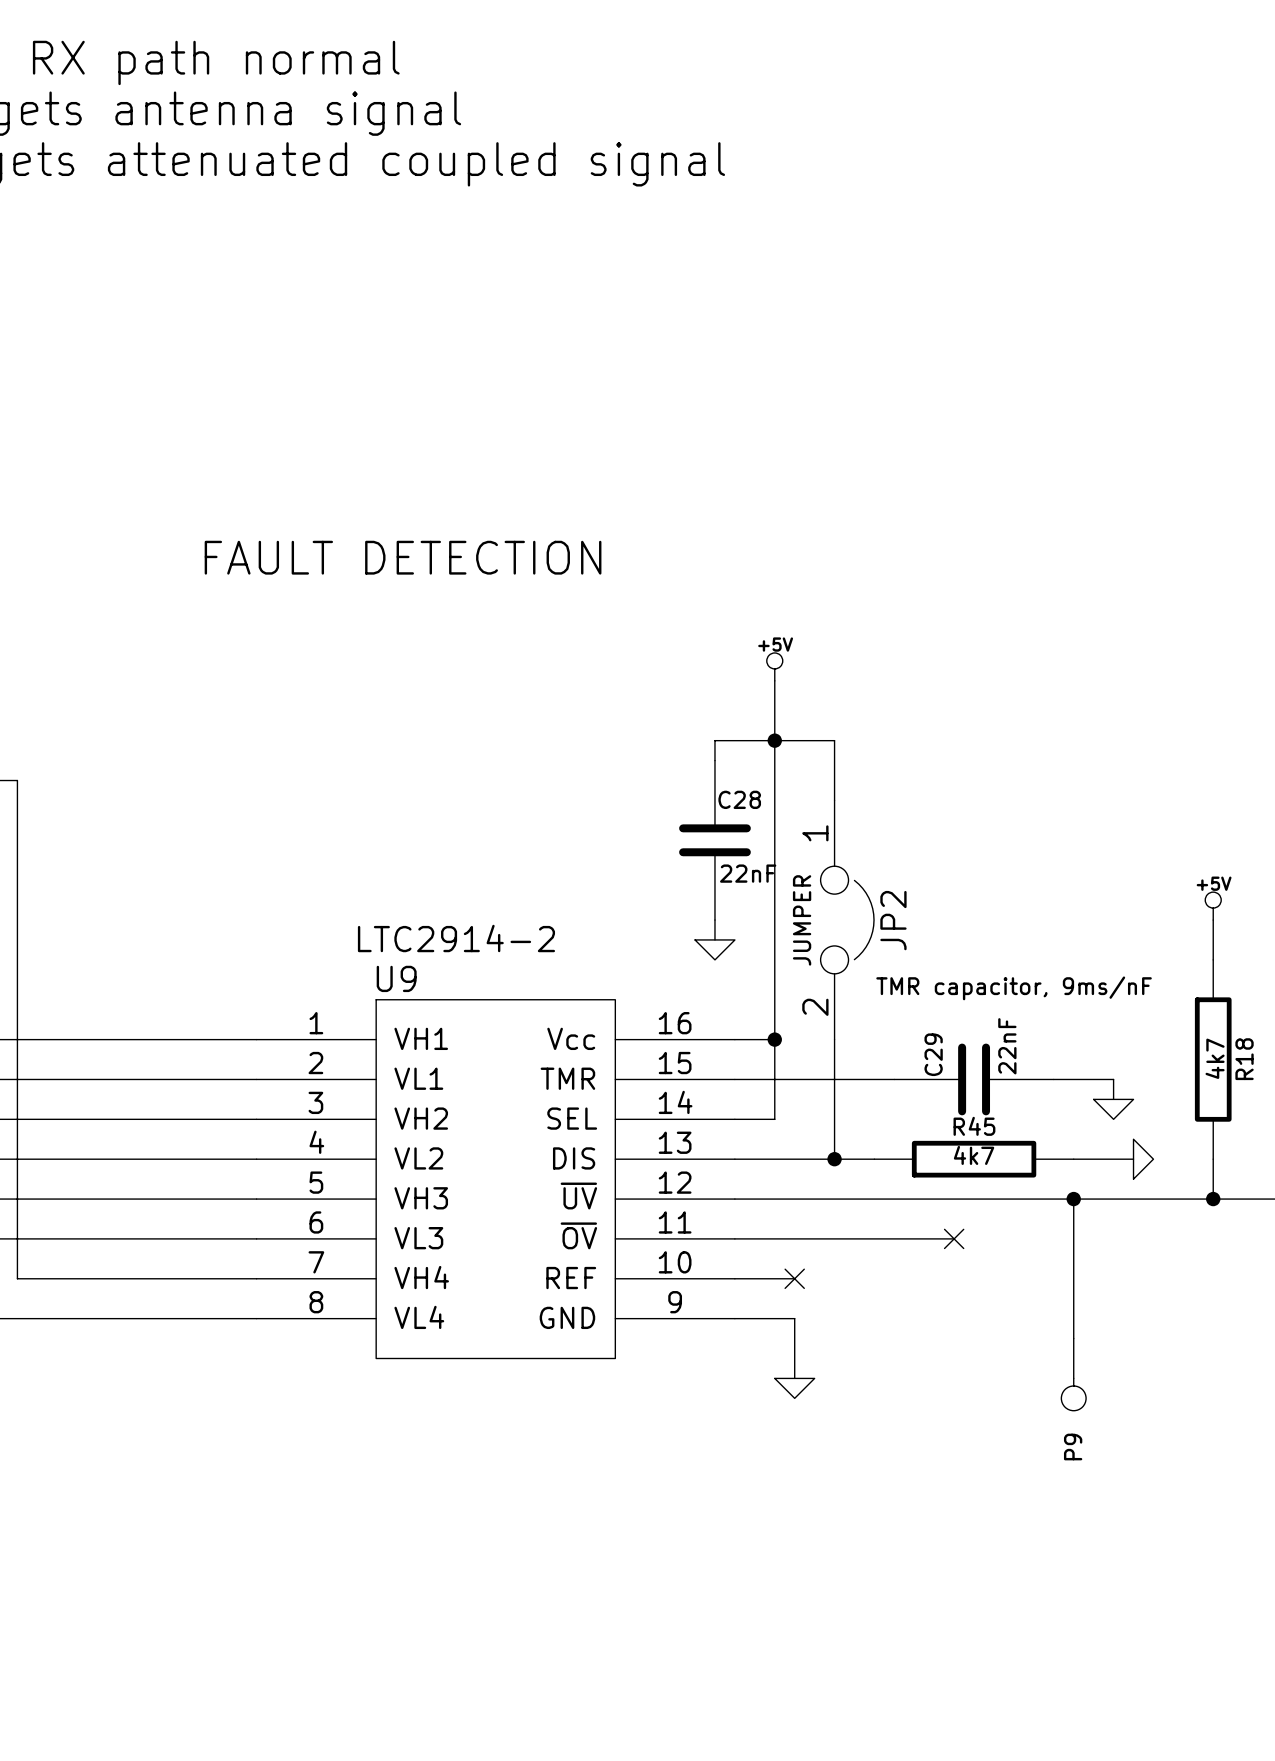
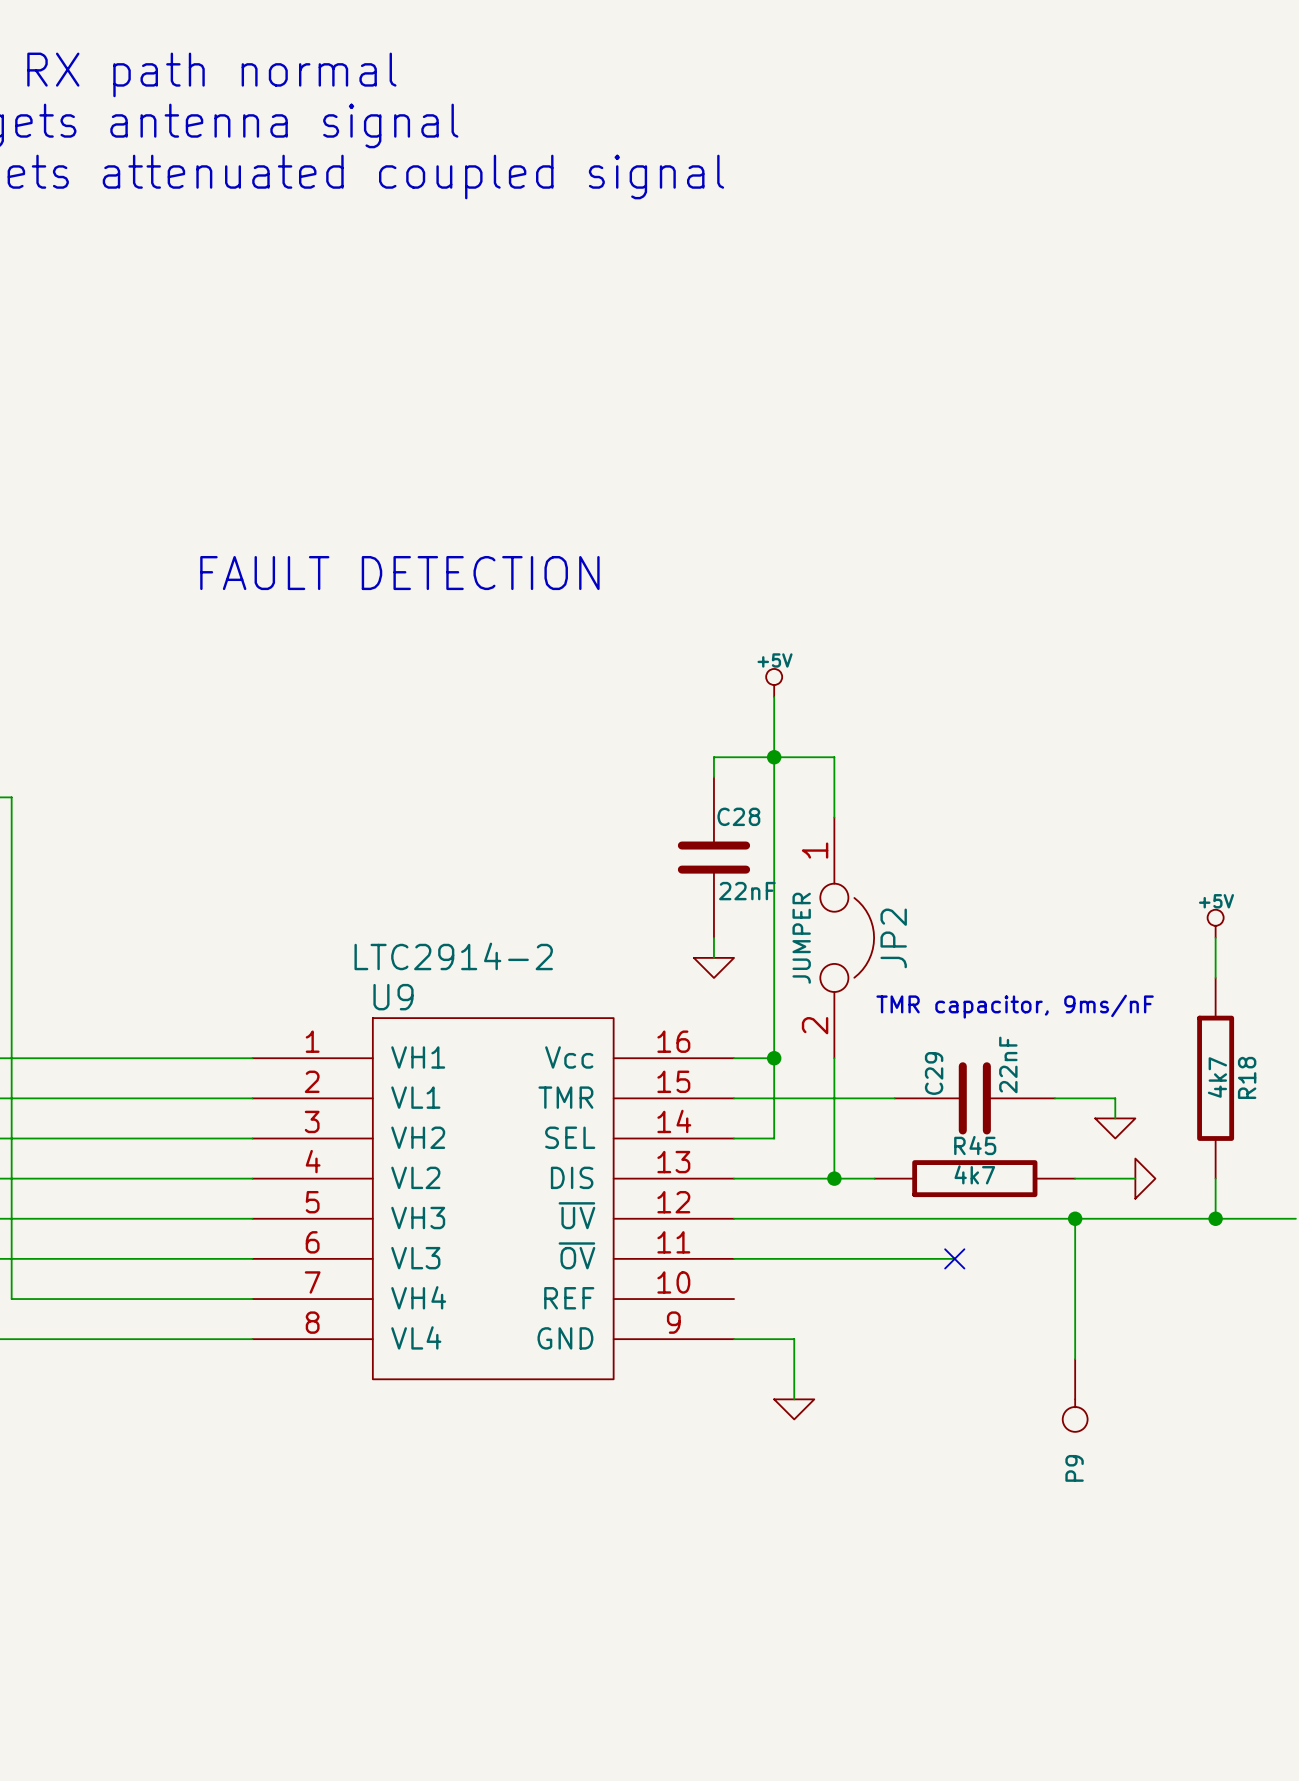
wire: (734, 1278) (794, 1278) -> none
no-connect mark: (794, 1278) -> none

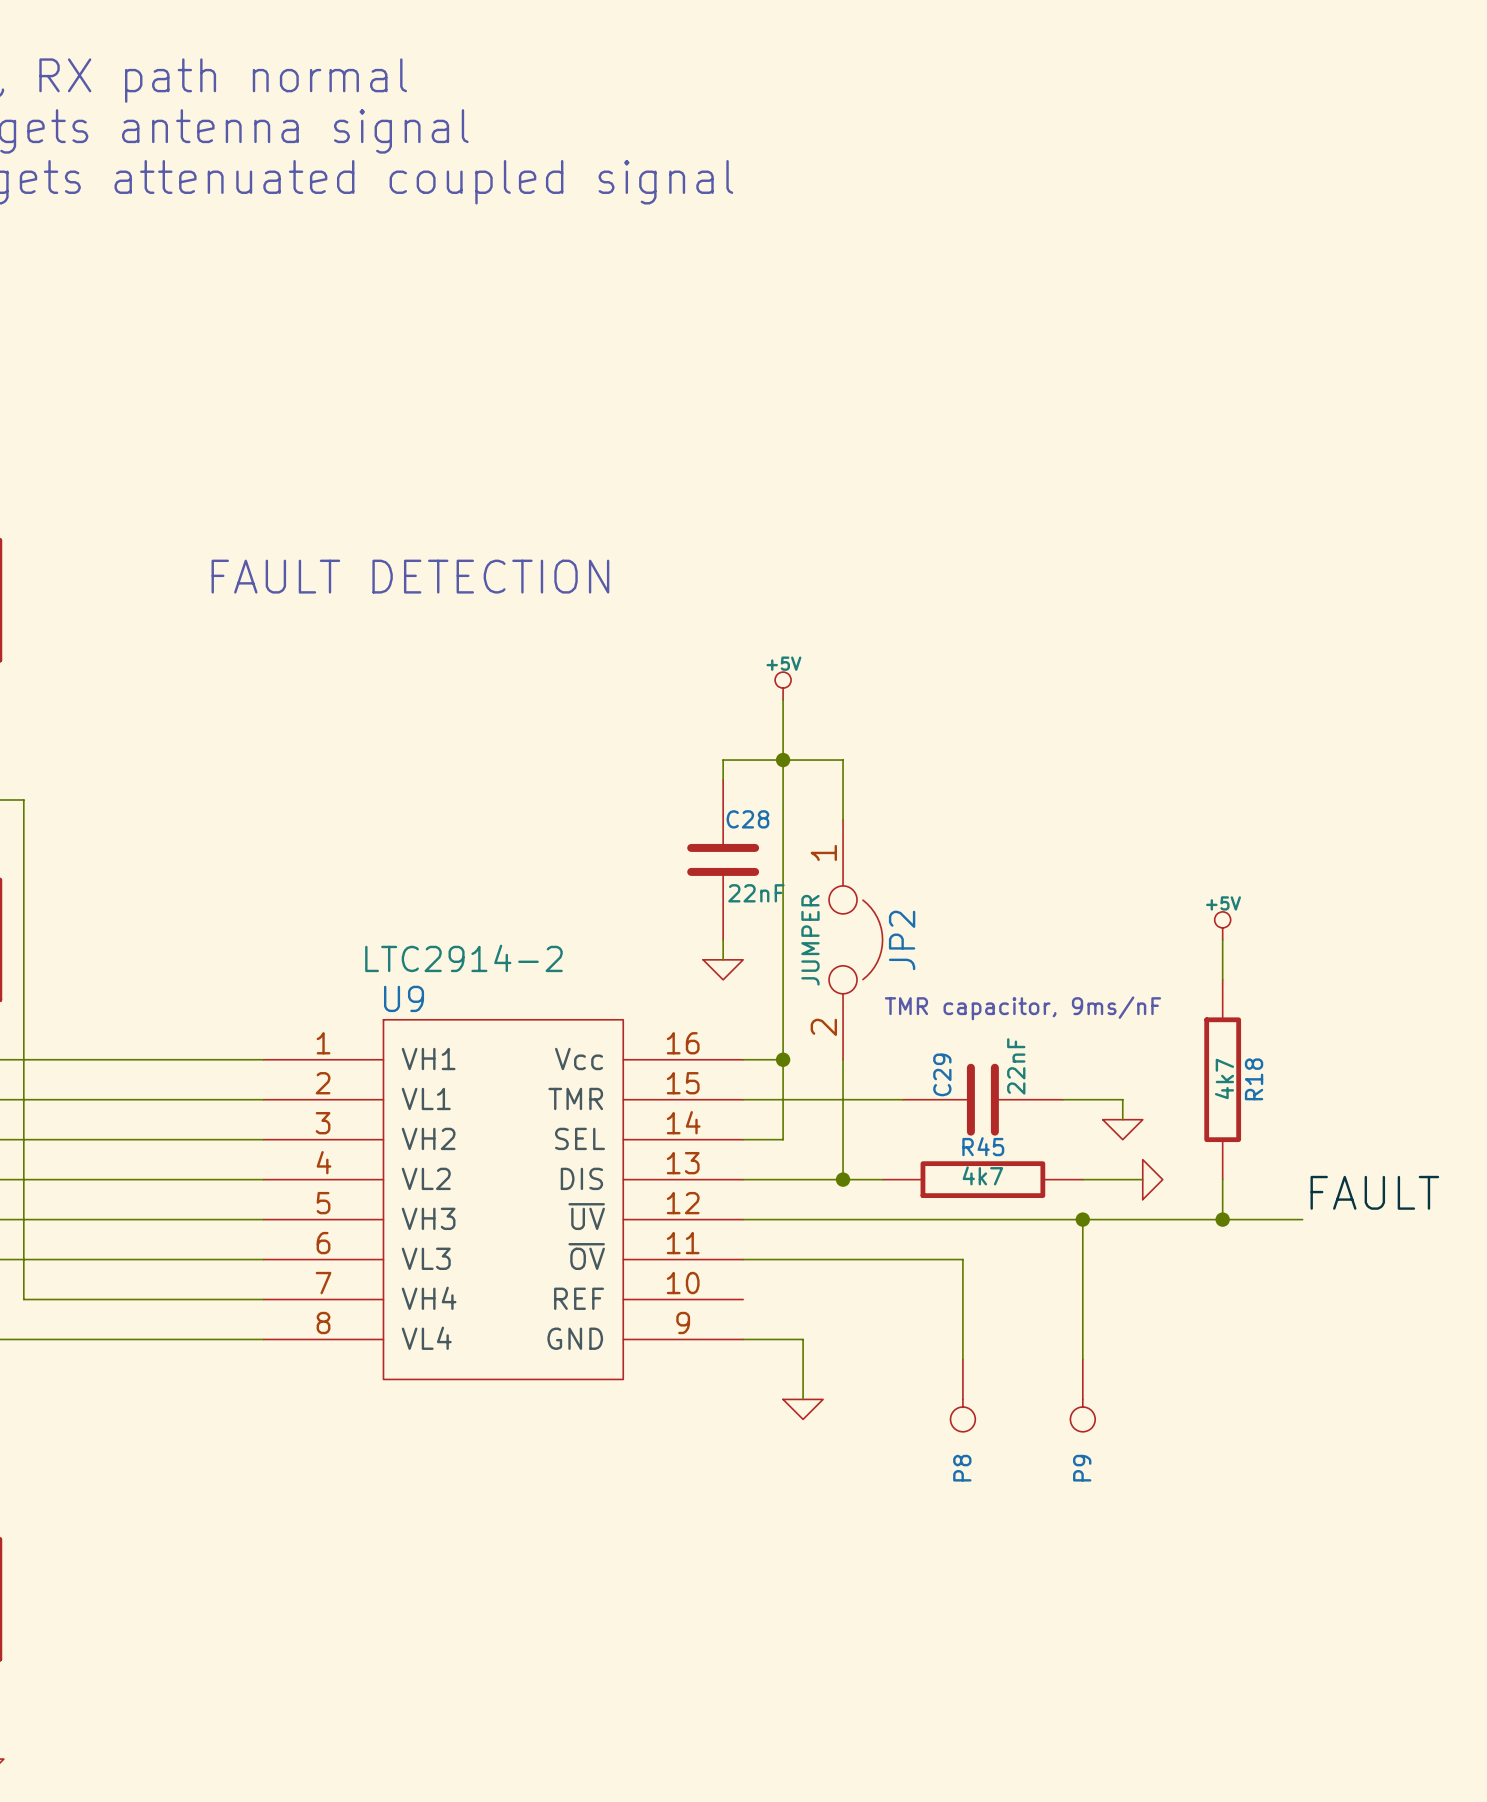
wire: none -> (962, 1259) (962, 1359)
no-connect mark: (954, 1258) -> none
P8: none -> (962, 1395)

